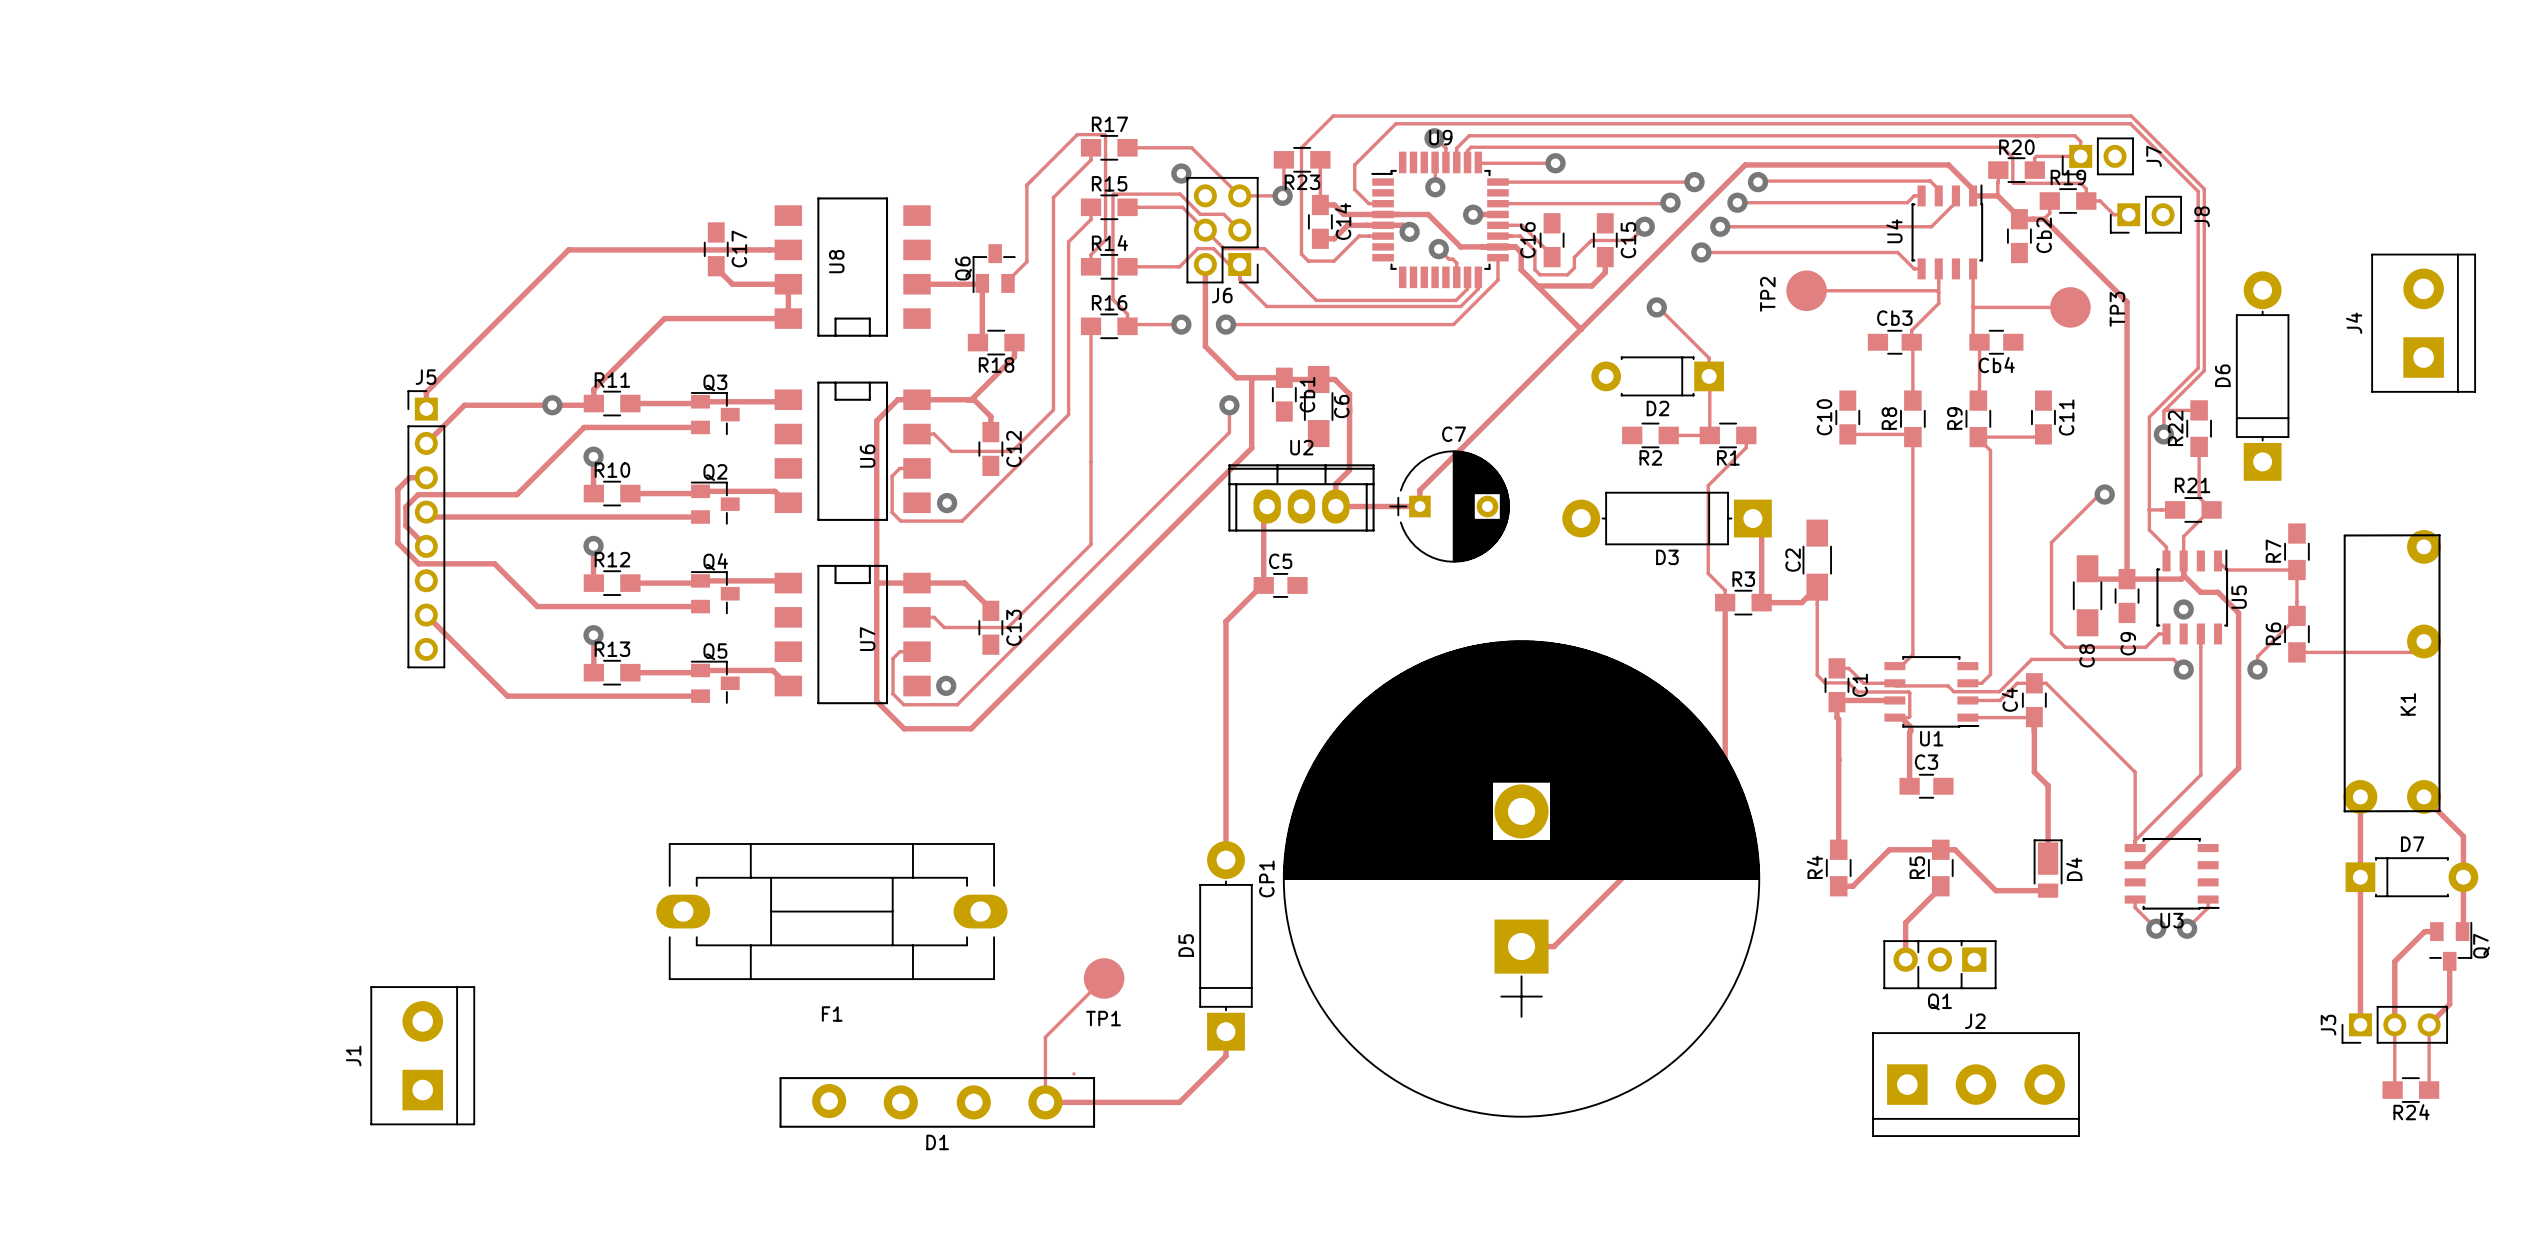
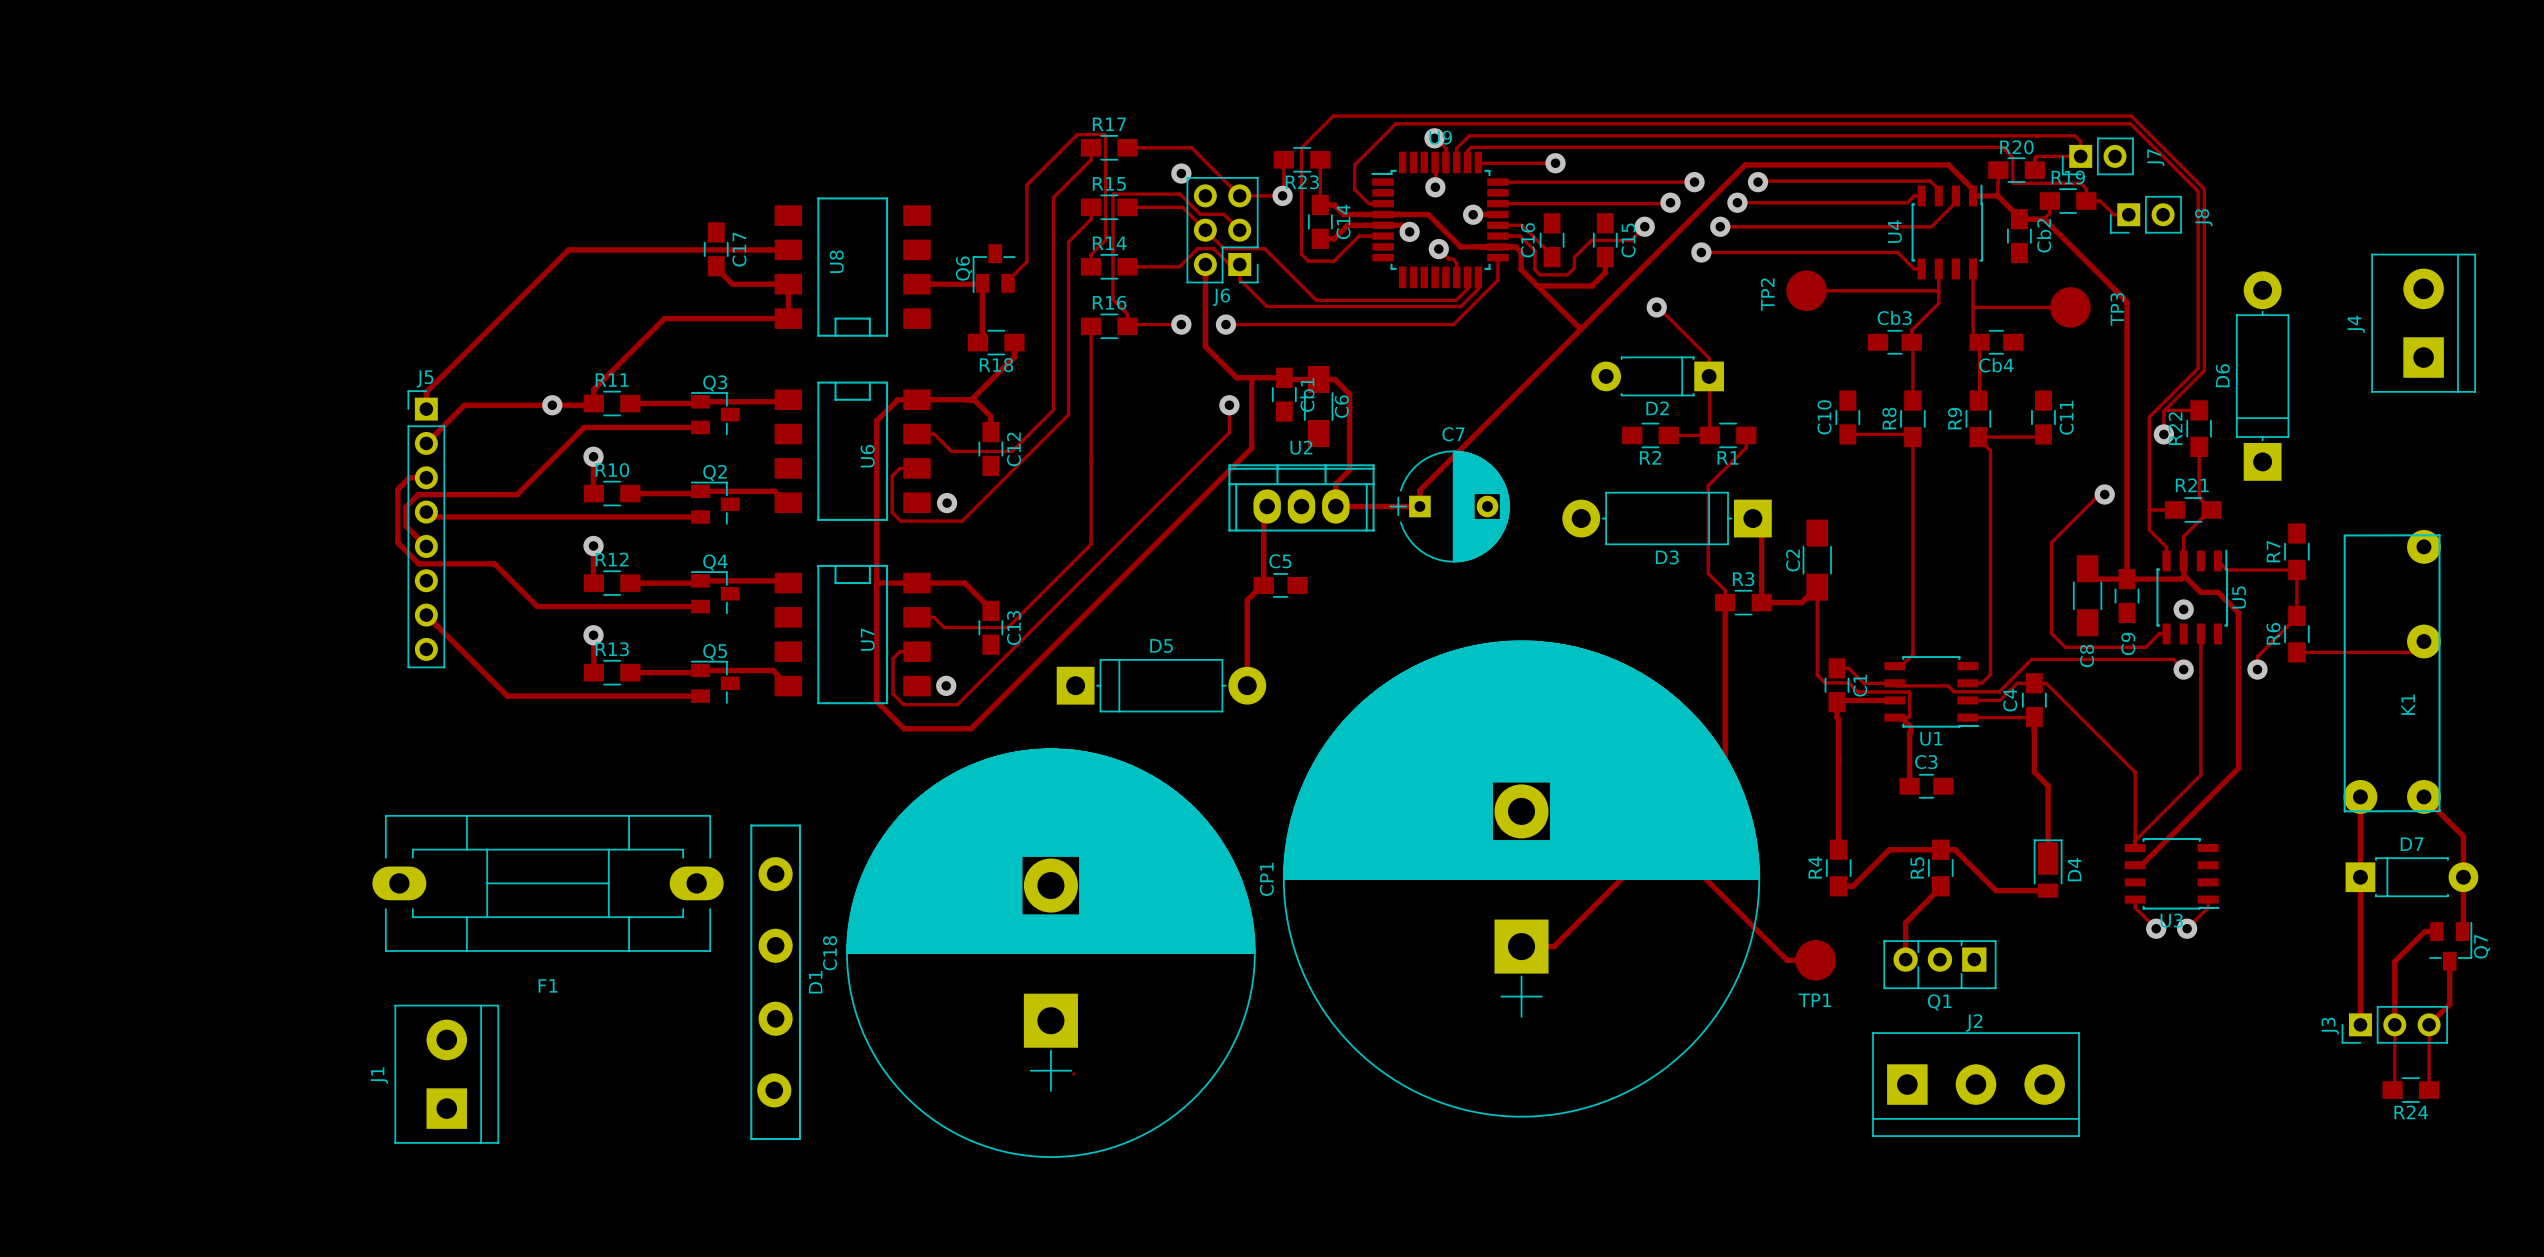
track: (1247, 600) (1226, 621) (1225, 860) -> (1247, 600) (1247, 685)
track: none -> (1664, 836) (1787, 960) (1815, 960)
F1 position: (831, 911) -> (548, 883)
D5 rotation: 0° (1225, 945) -> 90° clockwise (1161, 685)
D5 position: (1225, 945) -> (1161, 685)
C18: none -> (1050, 953)
track: (1104, 978) (1045, 1037) (1045, 1102) (1179, 1102) (1225, 1056) (1225, 1031) -> none
TP1 position: (1104, 978) -> (1815, 960)
J1 position: (422, 1055) -> (446, 1074)
D1 rotation: 0° (937, 1102) -> 90° counterclockwise (775, 982)
D1 position: (937, 1102) -> (775, 982)

